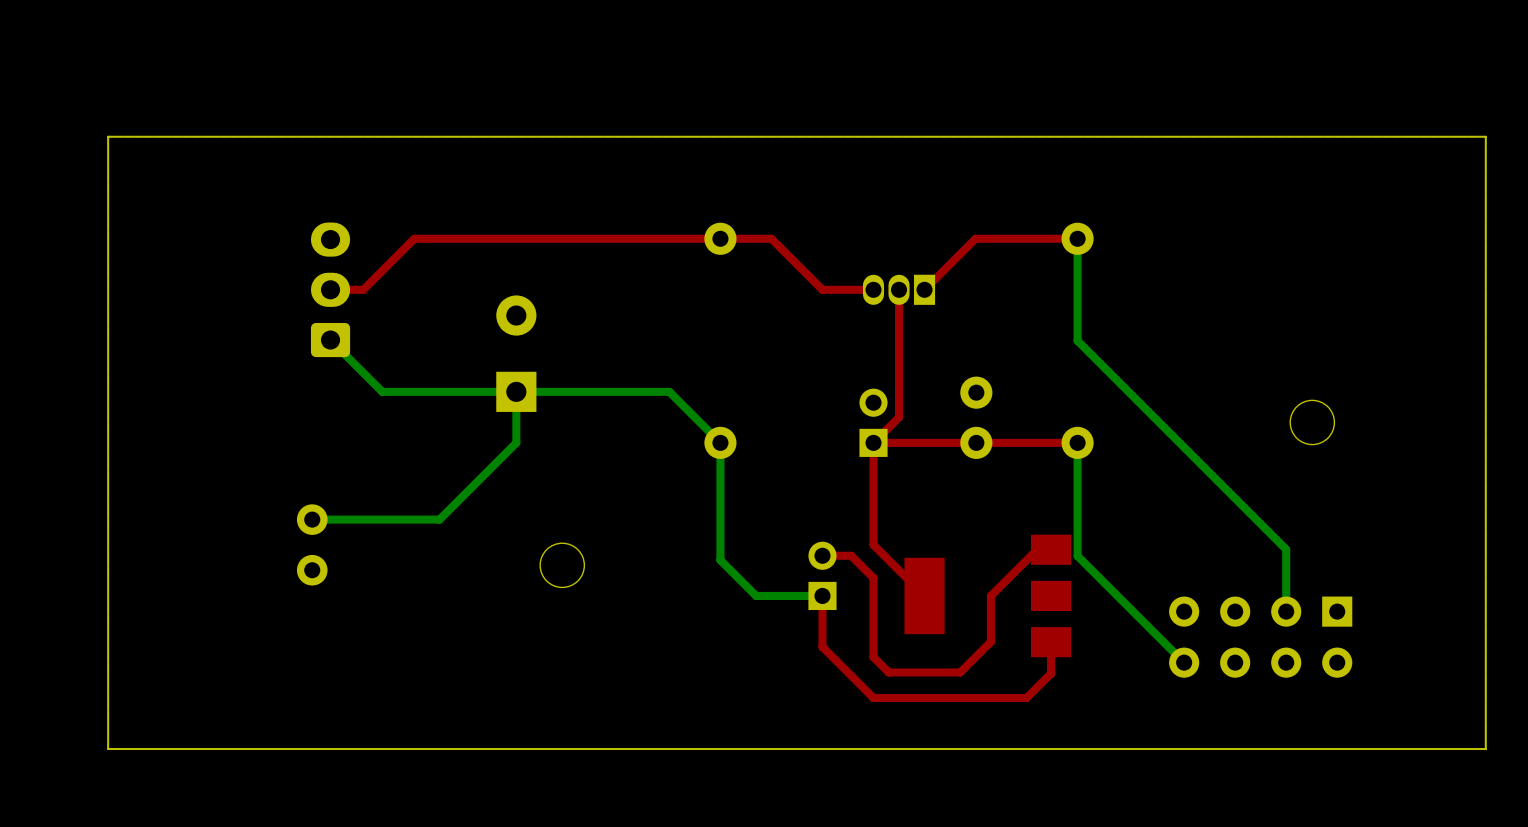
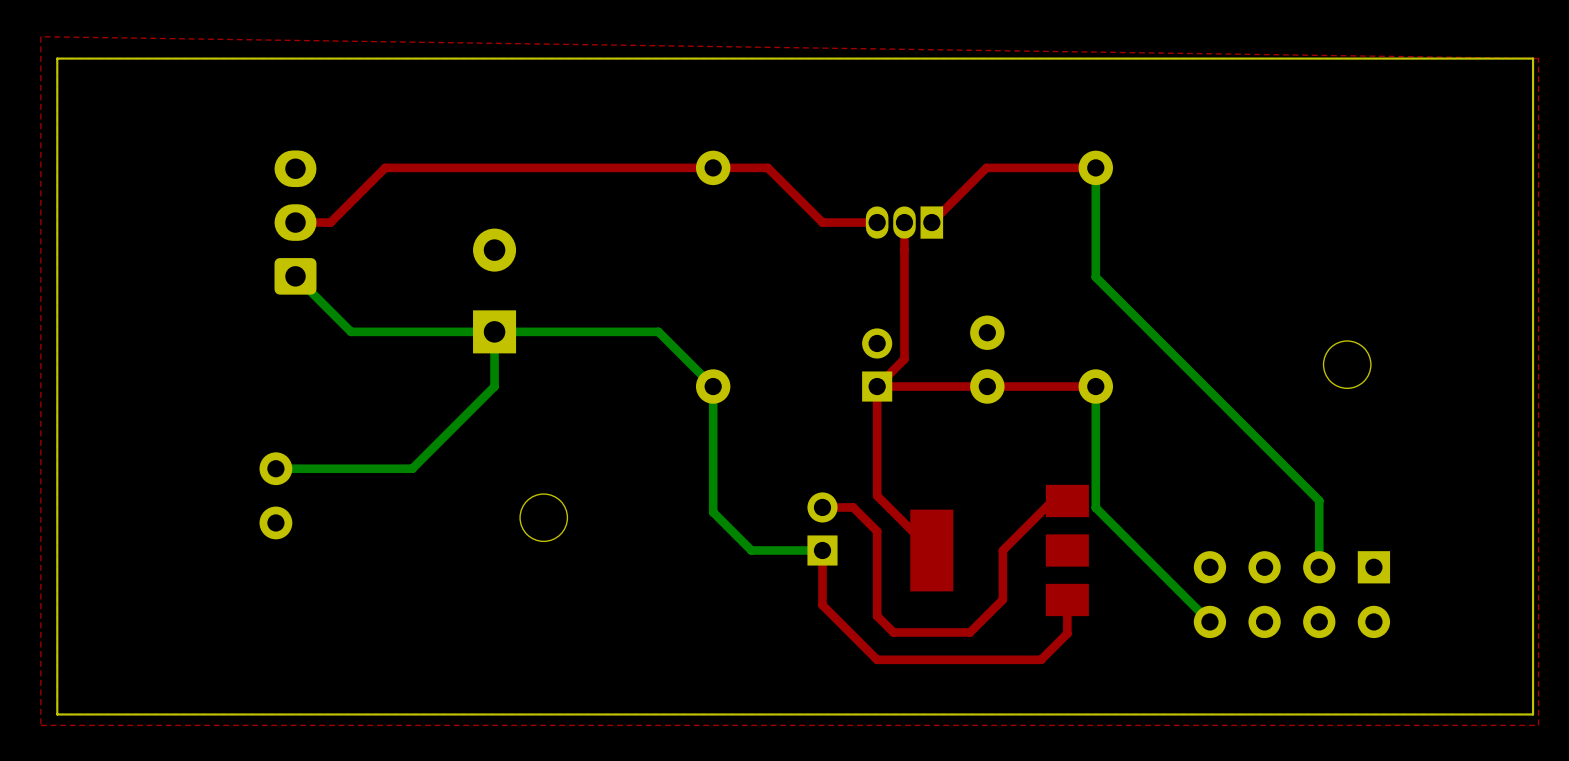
top zone outline: none -> (40, 36) (1538, 58) (1538, 725) (40, 725) (40, 36)

